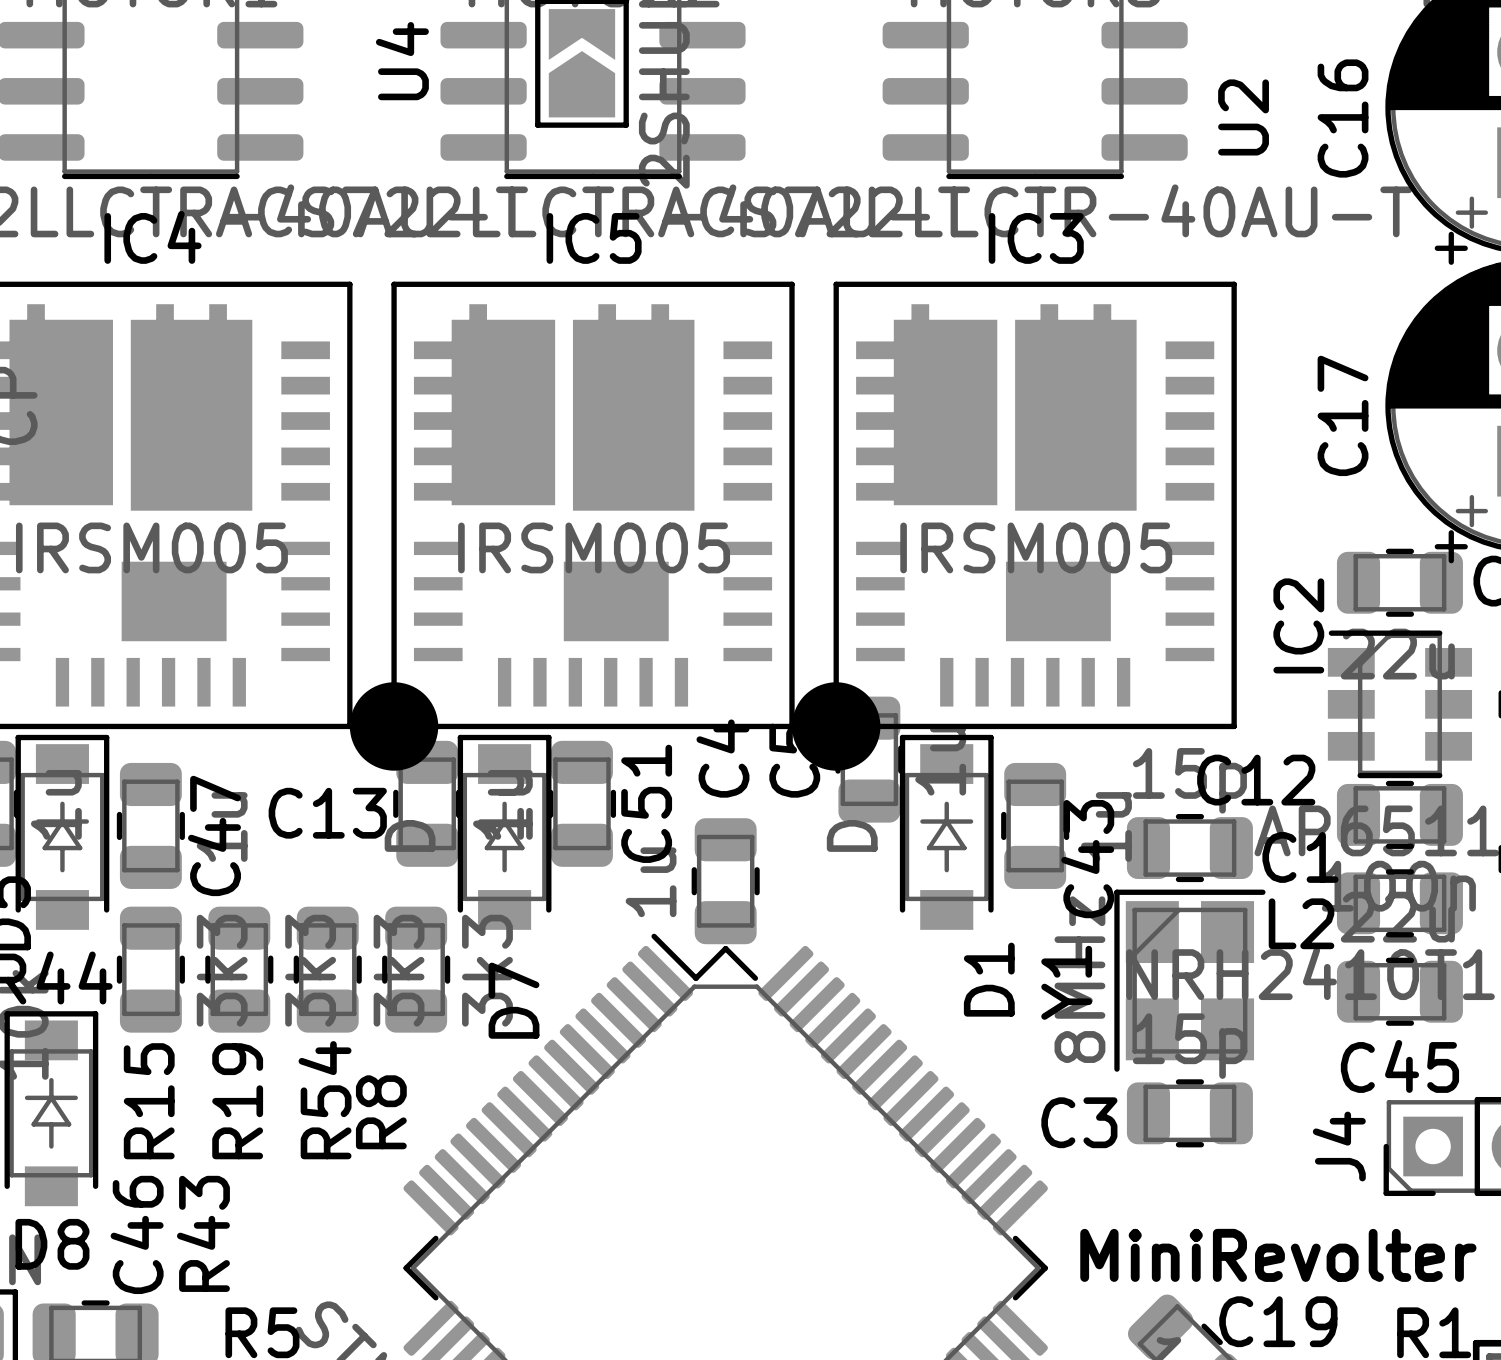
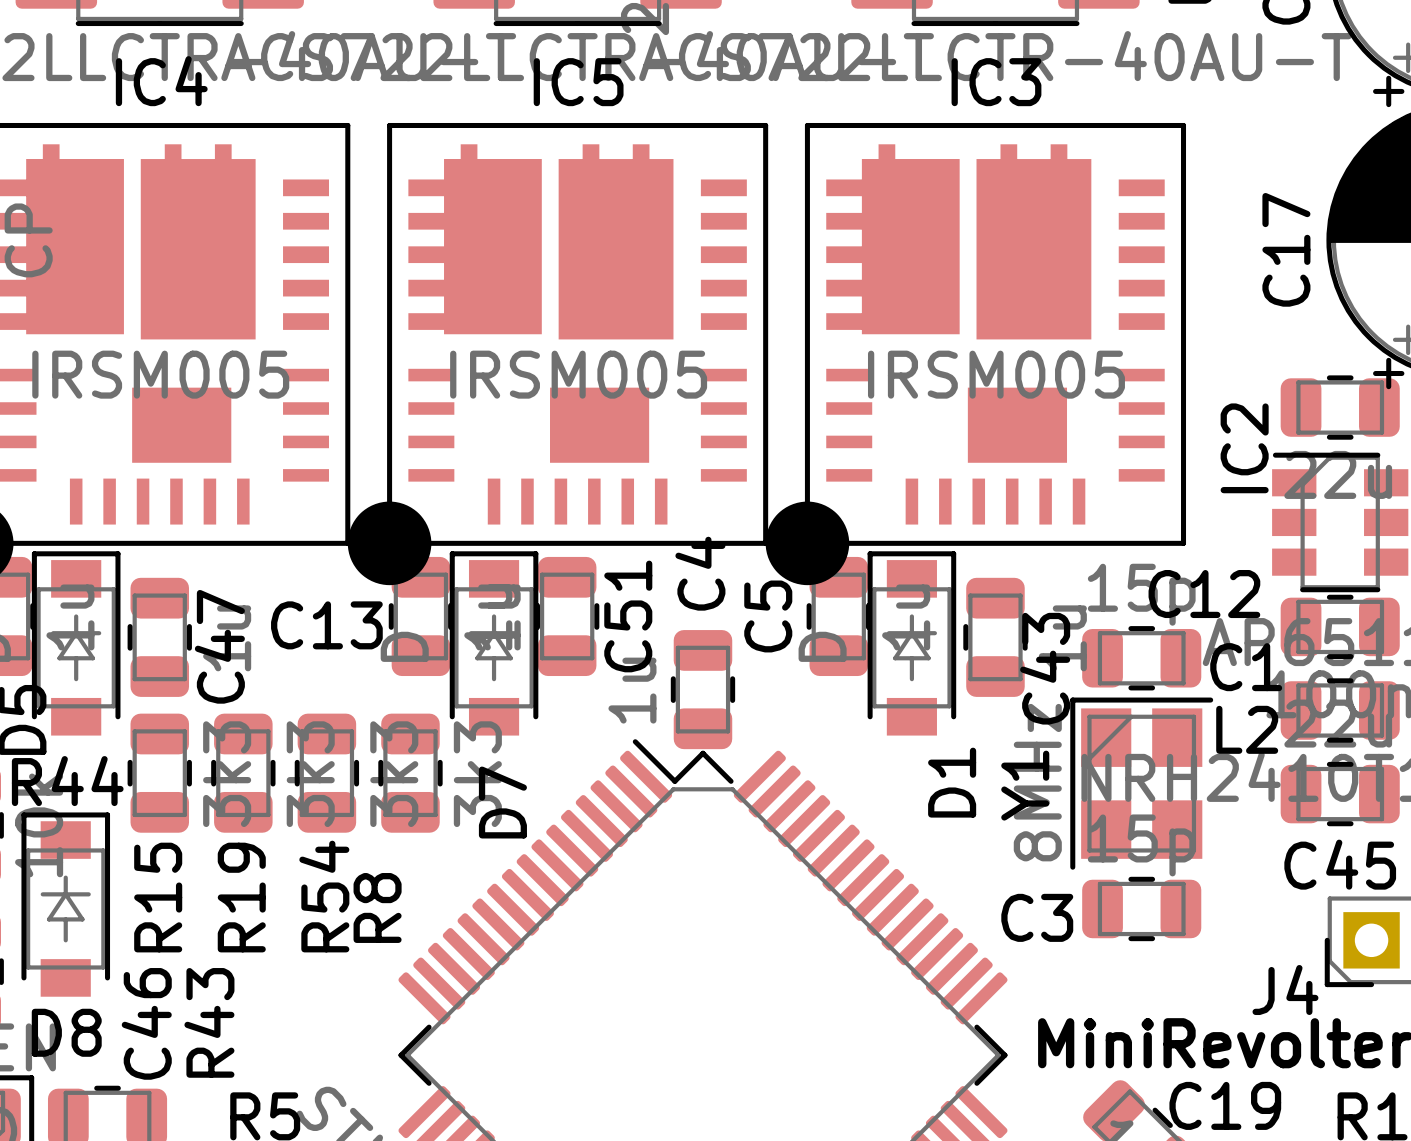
C5 position: (869, 759) -> (838, 616)
J4 name rotation: 0° (1339, 1146) -> 90° clockwise (1285, 989)

